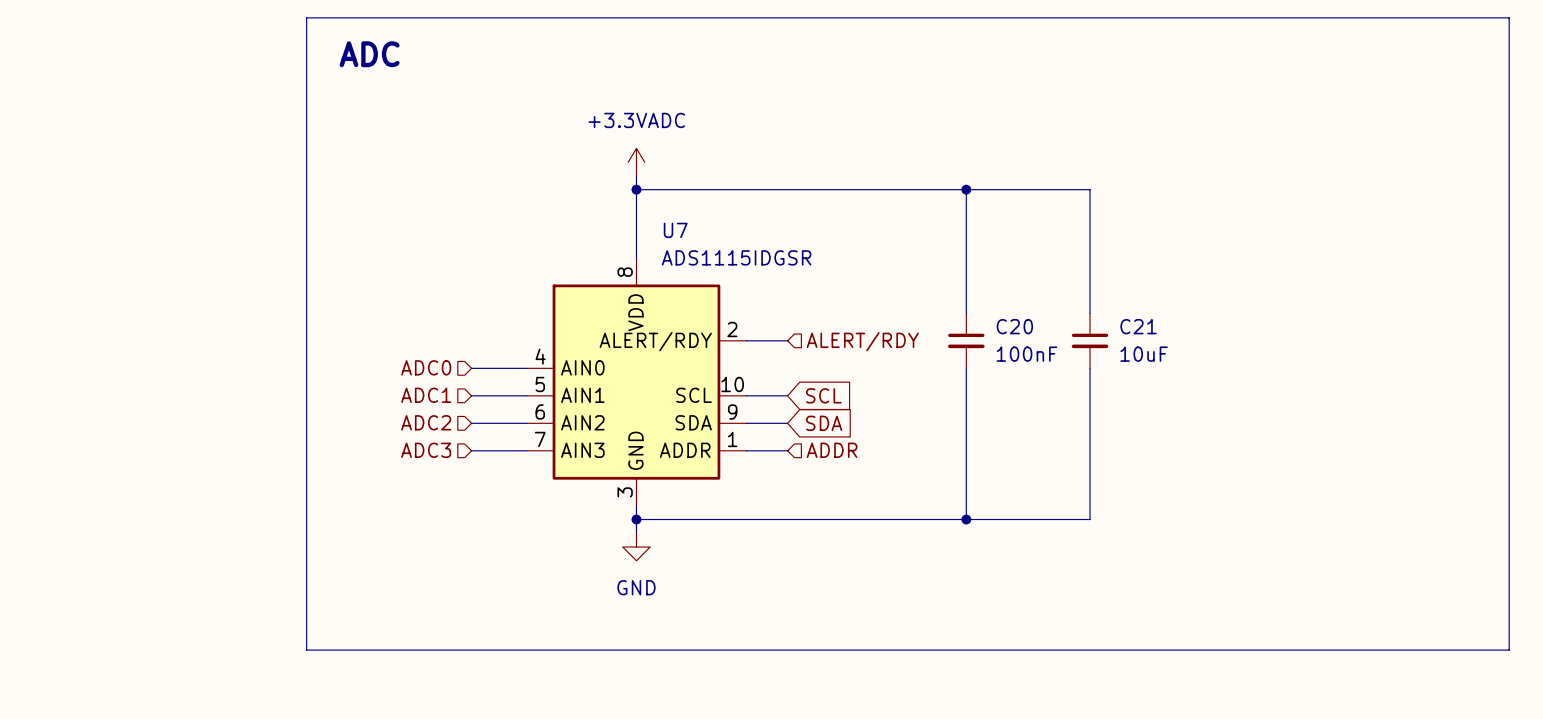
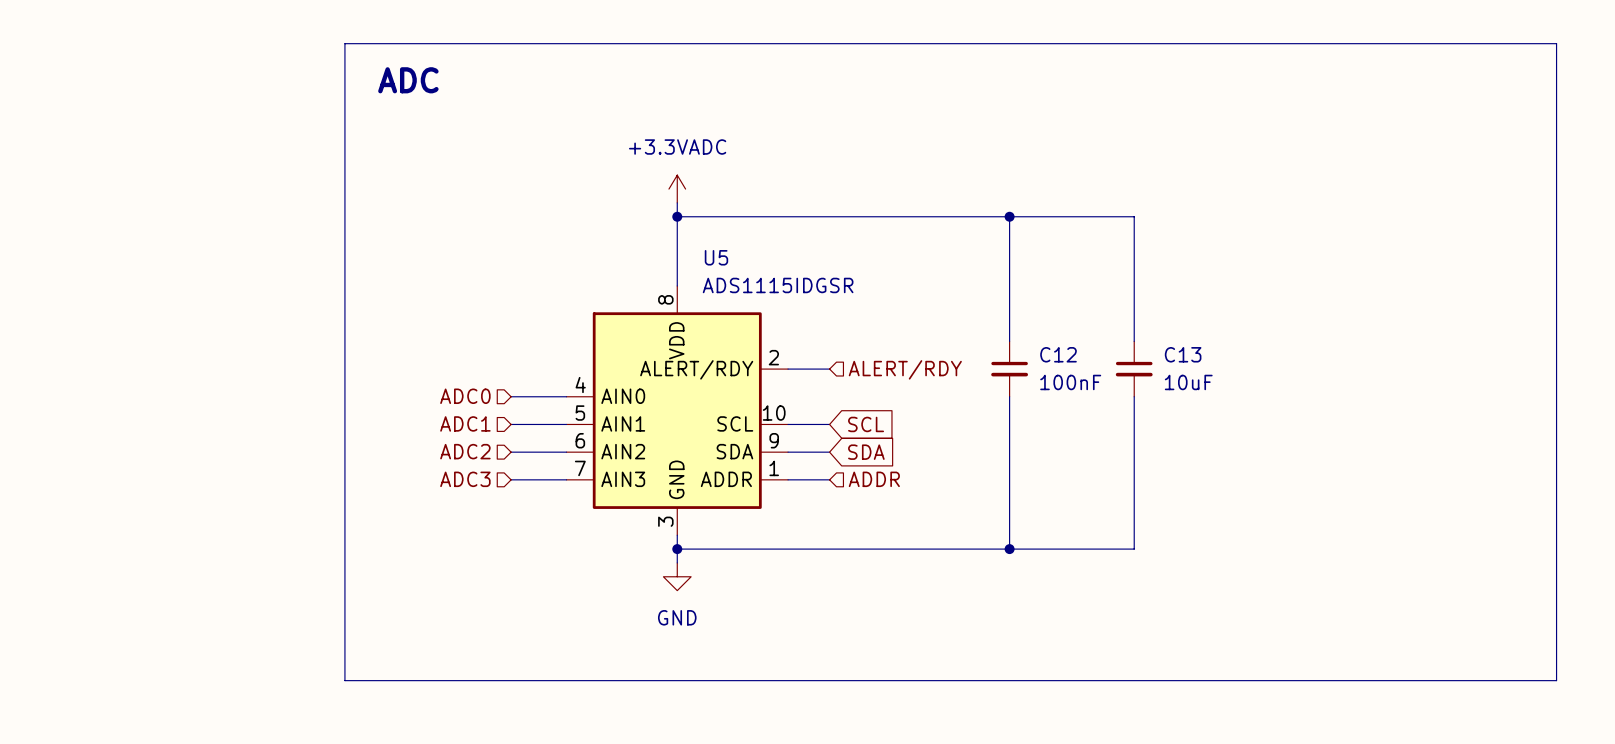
U7 name: U7 (675, 230) -> U5 (716, 257)
C20 name: C20 (1014, 326) -> C12 (1058, 354)
C21 name: C21 (1138, 326) -> C13 (1183, 354)

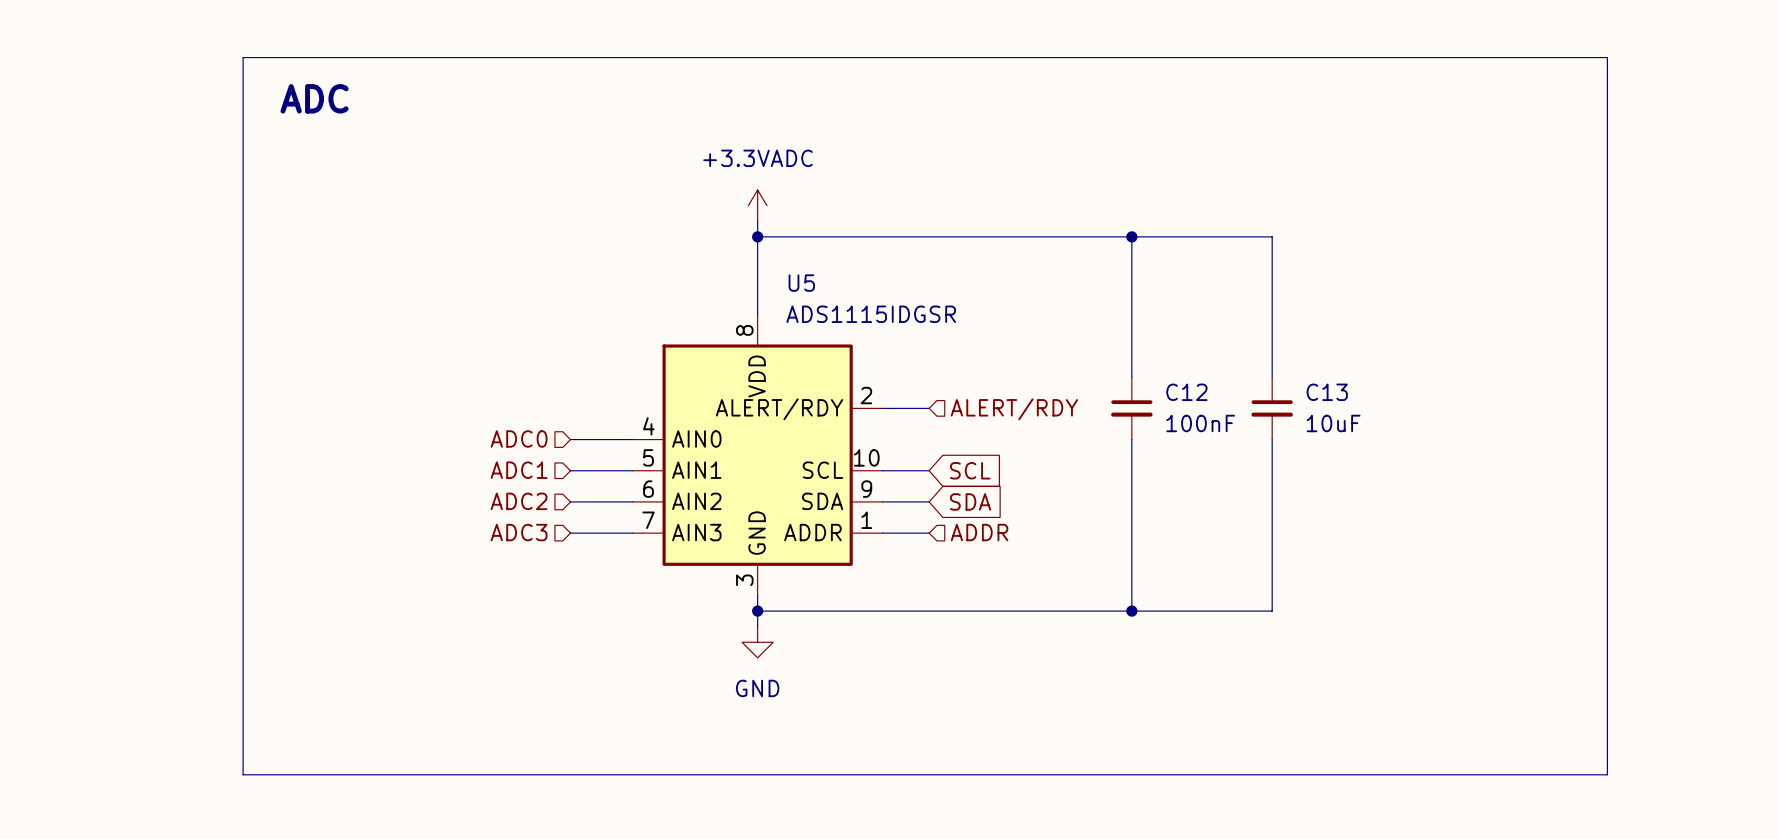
line: (344, 43) (1556, 43) (1556, 680) (344, 680) (344, 43) -> (243, 57) (243, 774) (1607, 774) (1607, 57) (243, 57)
text position: ADC (408, 80) -> ADC (314, 98)

